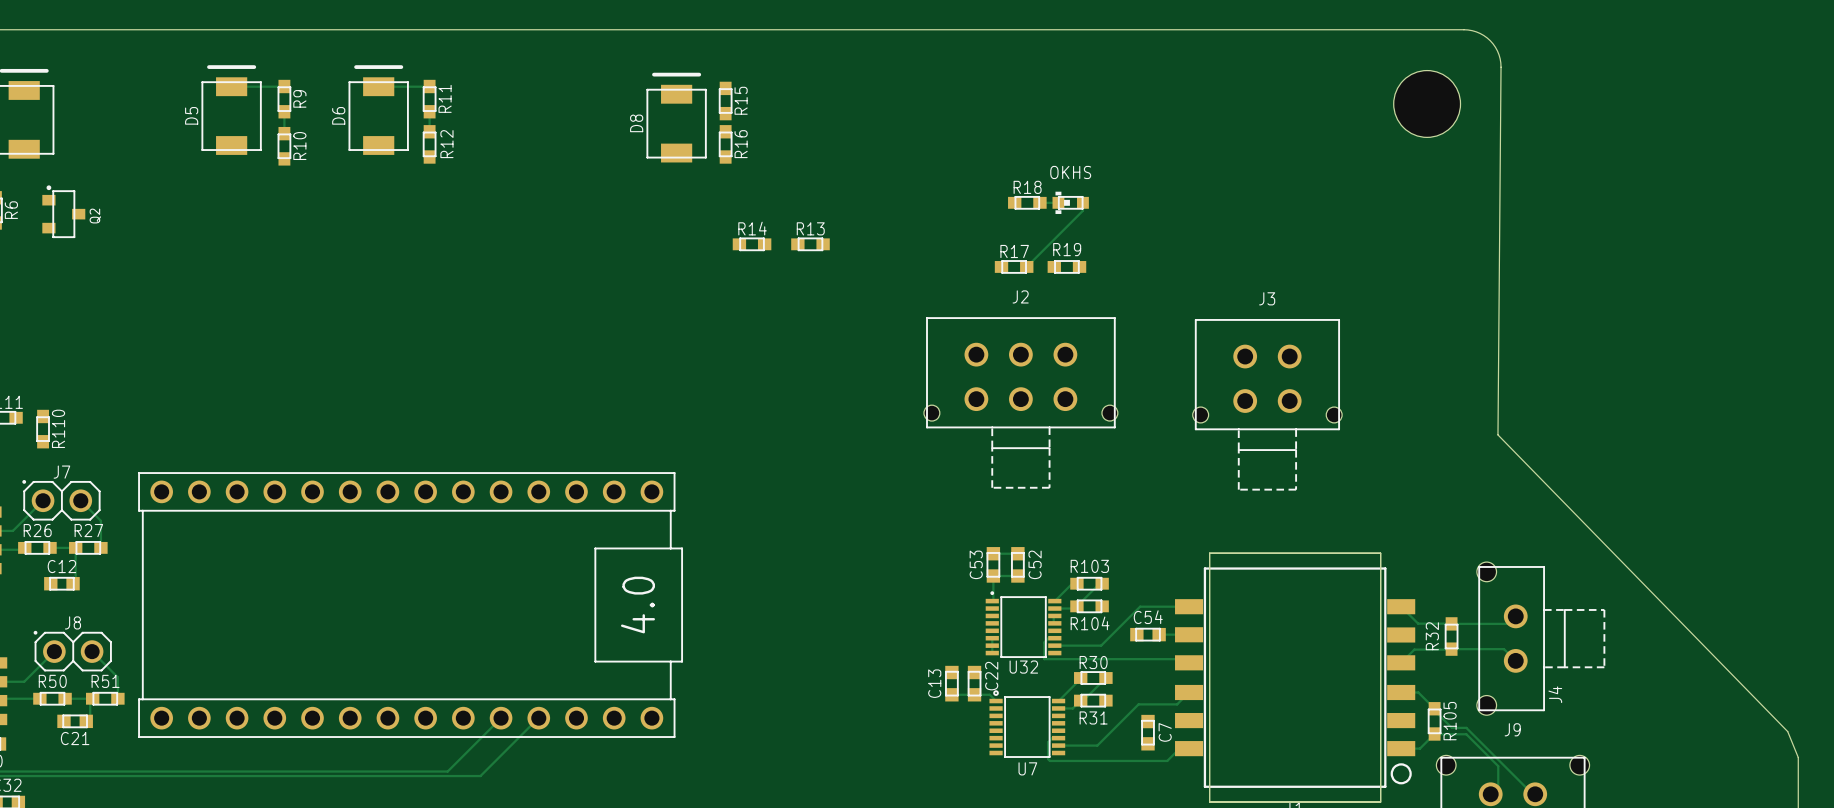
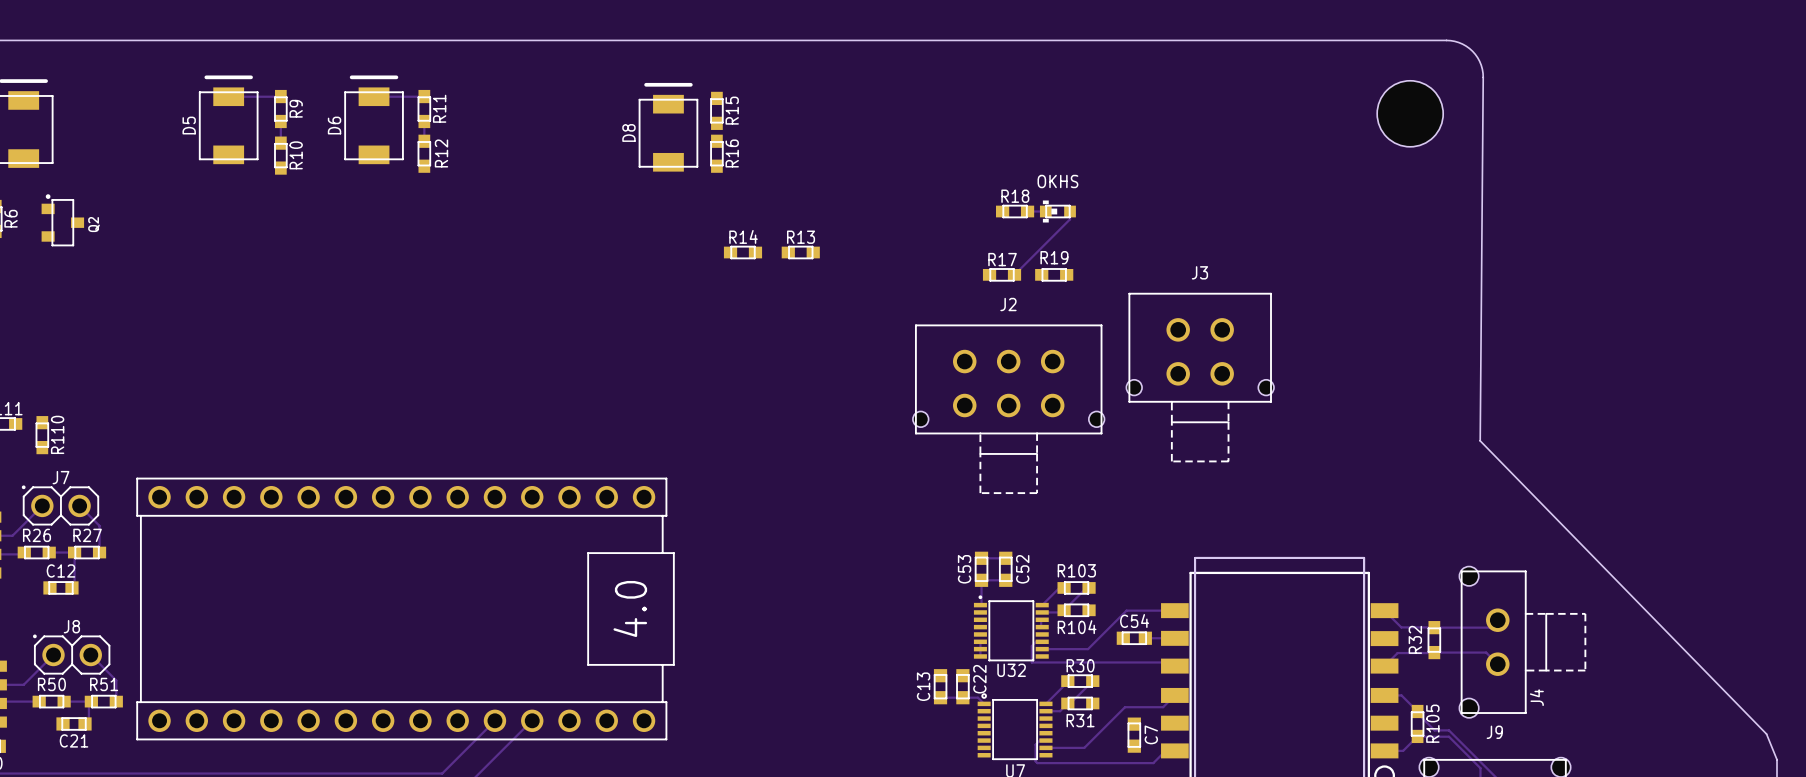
J3 position: (1267, 404) -> (1200, 377)

